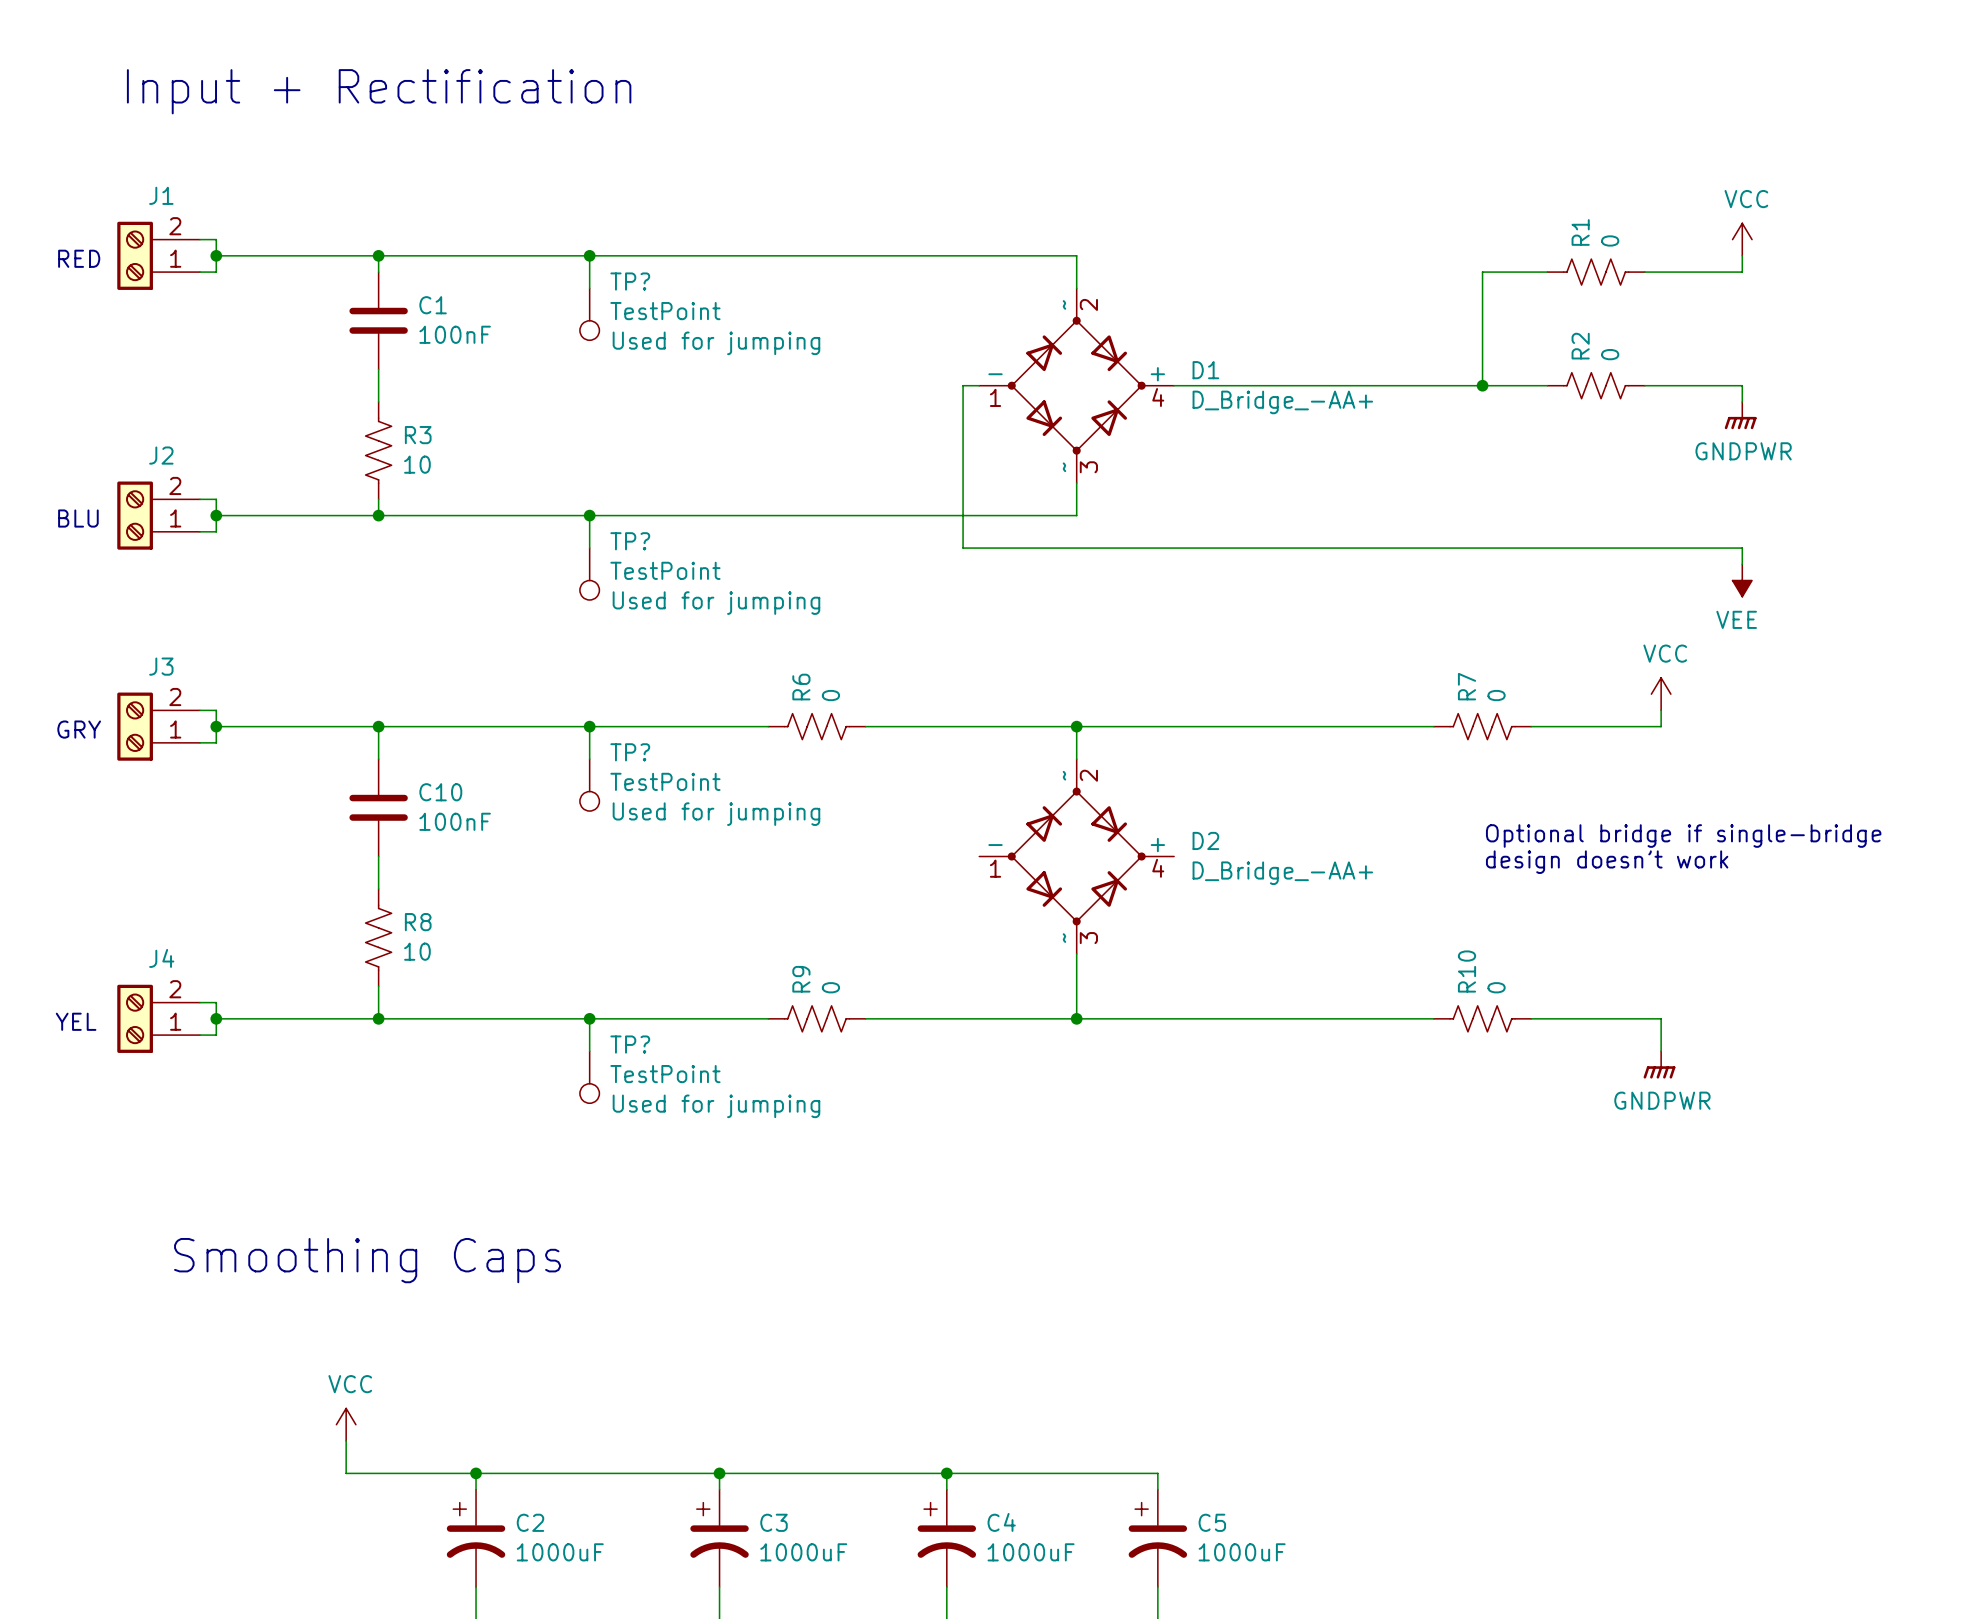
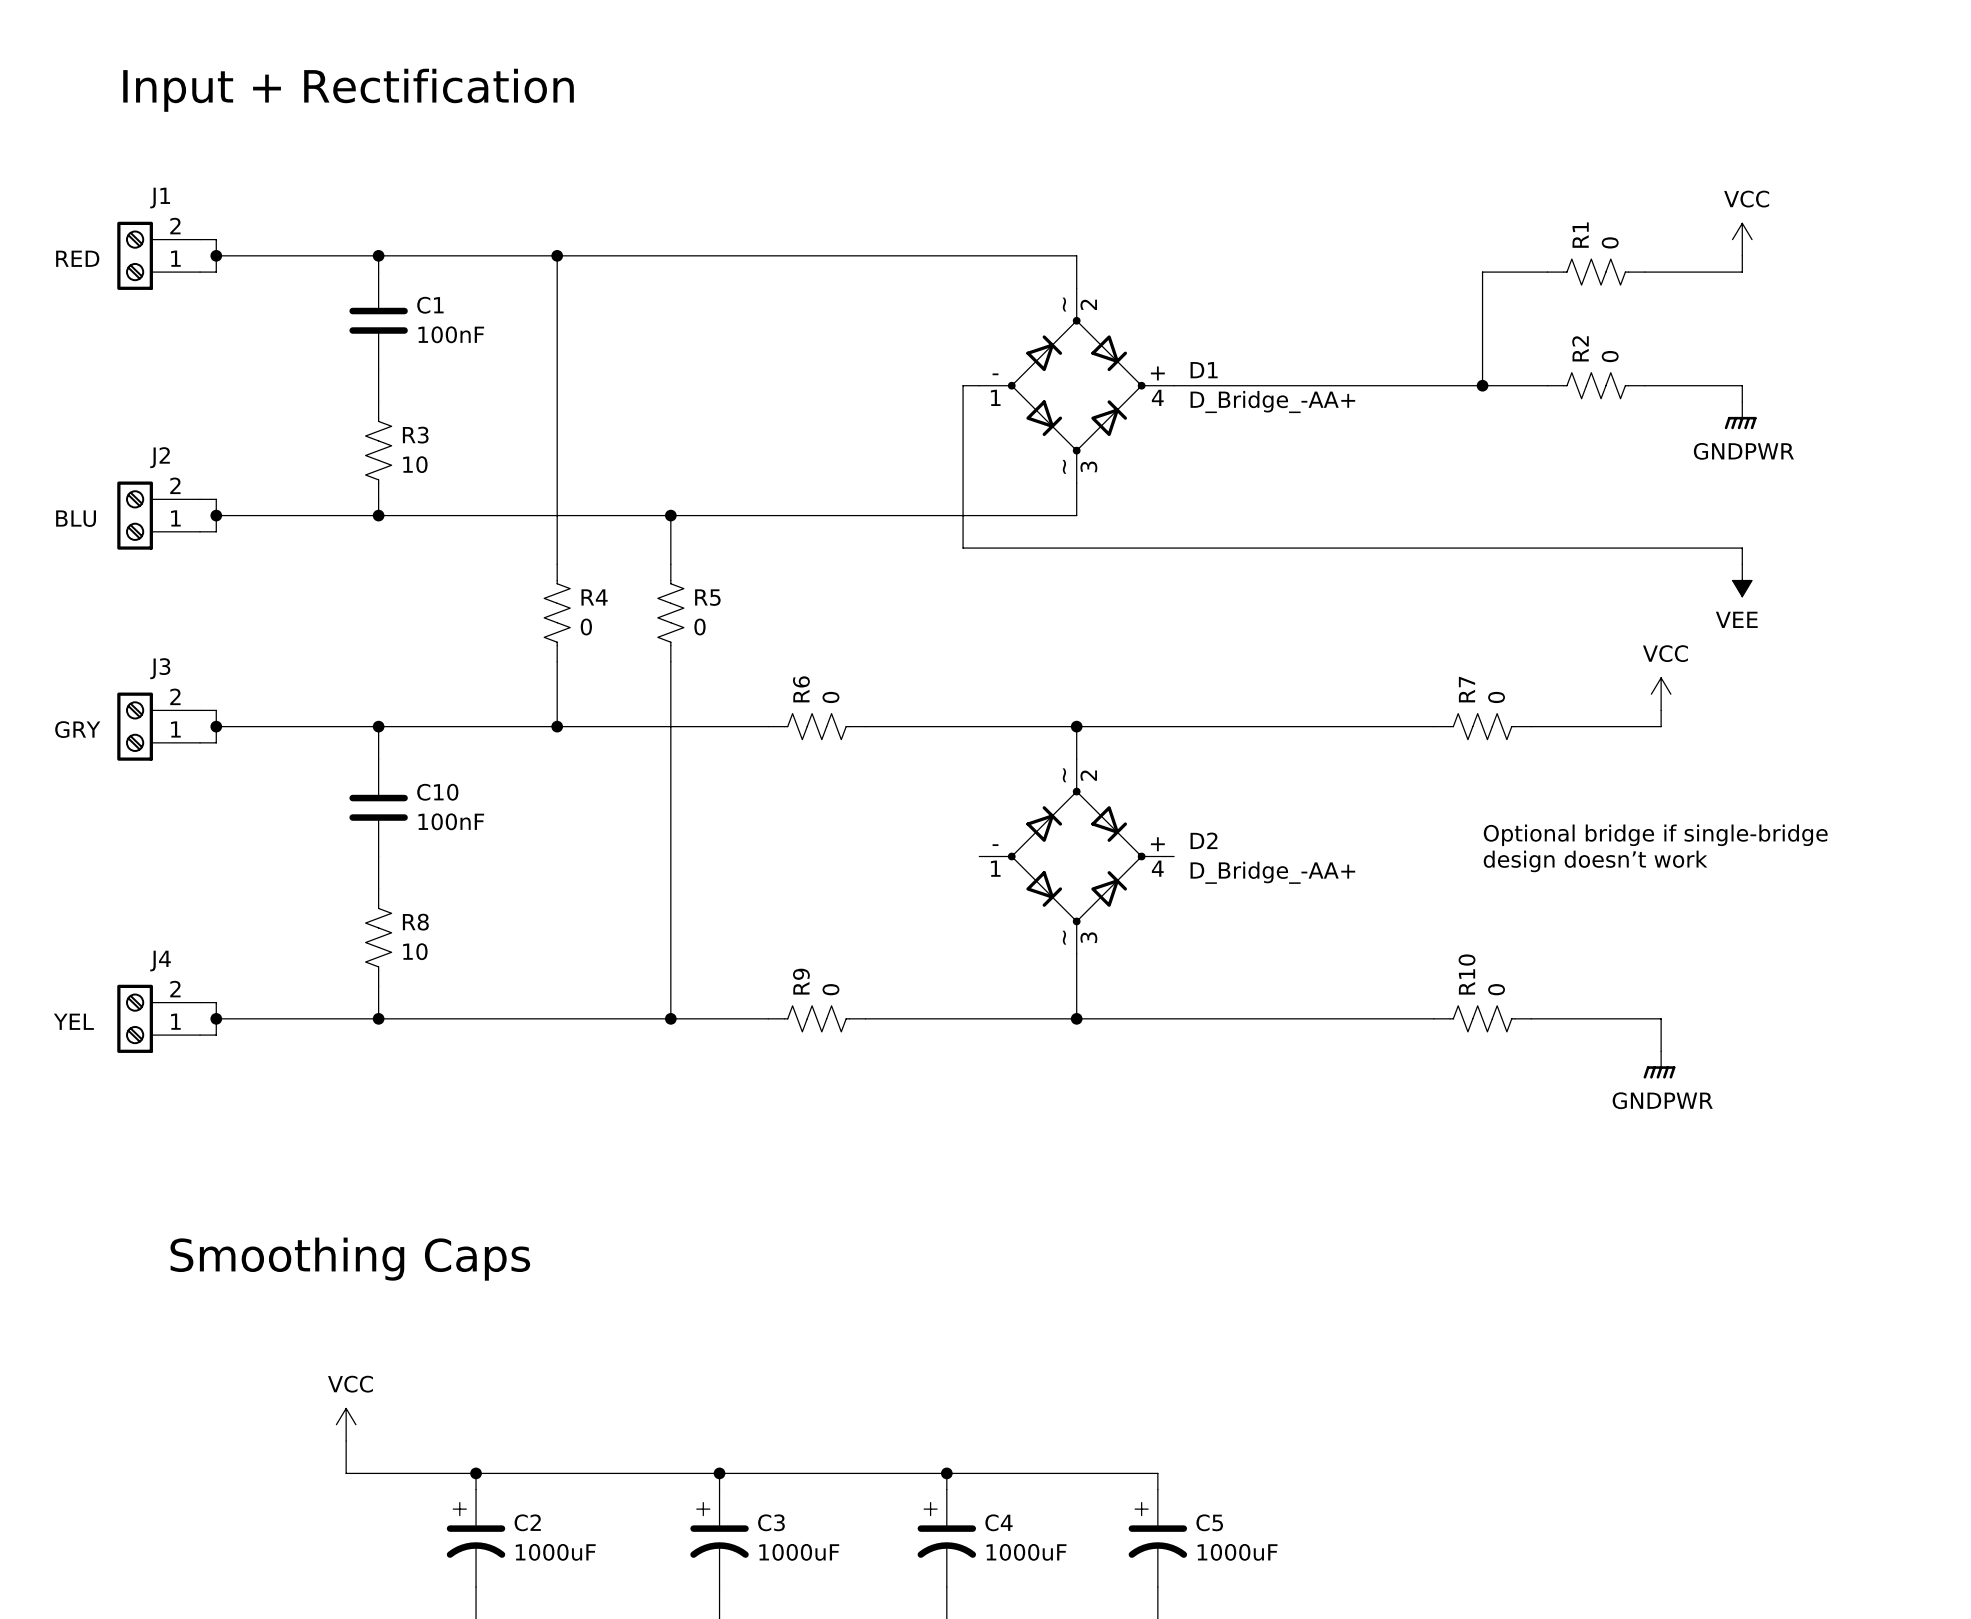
wire: none -> (557, 255) (557, 564)
wire: (589, 255) (589, 288) -> none
junction position: (589, 255) -> (557, 255)
TP?: TestPoint (589, 314) -> none
wire: (589, 515) (589, 548) -> none
junction: (589, 515) -> none
wire: none -> (670, 515) (670, 564)
junction: none -> (670, 515)
TP?: TestPoint (589, 574) -> none
R4: none -> 0 (557, 612)
R5: none -> 0 (670, 612)
wire: none -> (557, 661) (557, 726)
wire: none -> (670, 661) (670, 1018)
wire: (589, 726) (589, 759) -> none
junction position: (589, 726) -> (557, 726)
TP?: TestPoint (589, 785) -> none
wire: (589, 1018) (589, 1051) -> none
junction: (589, 1018) -> none
junction: none -> (670, 1018)
TP?: TestPoint (589, 1077) -> none

